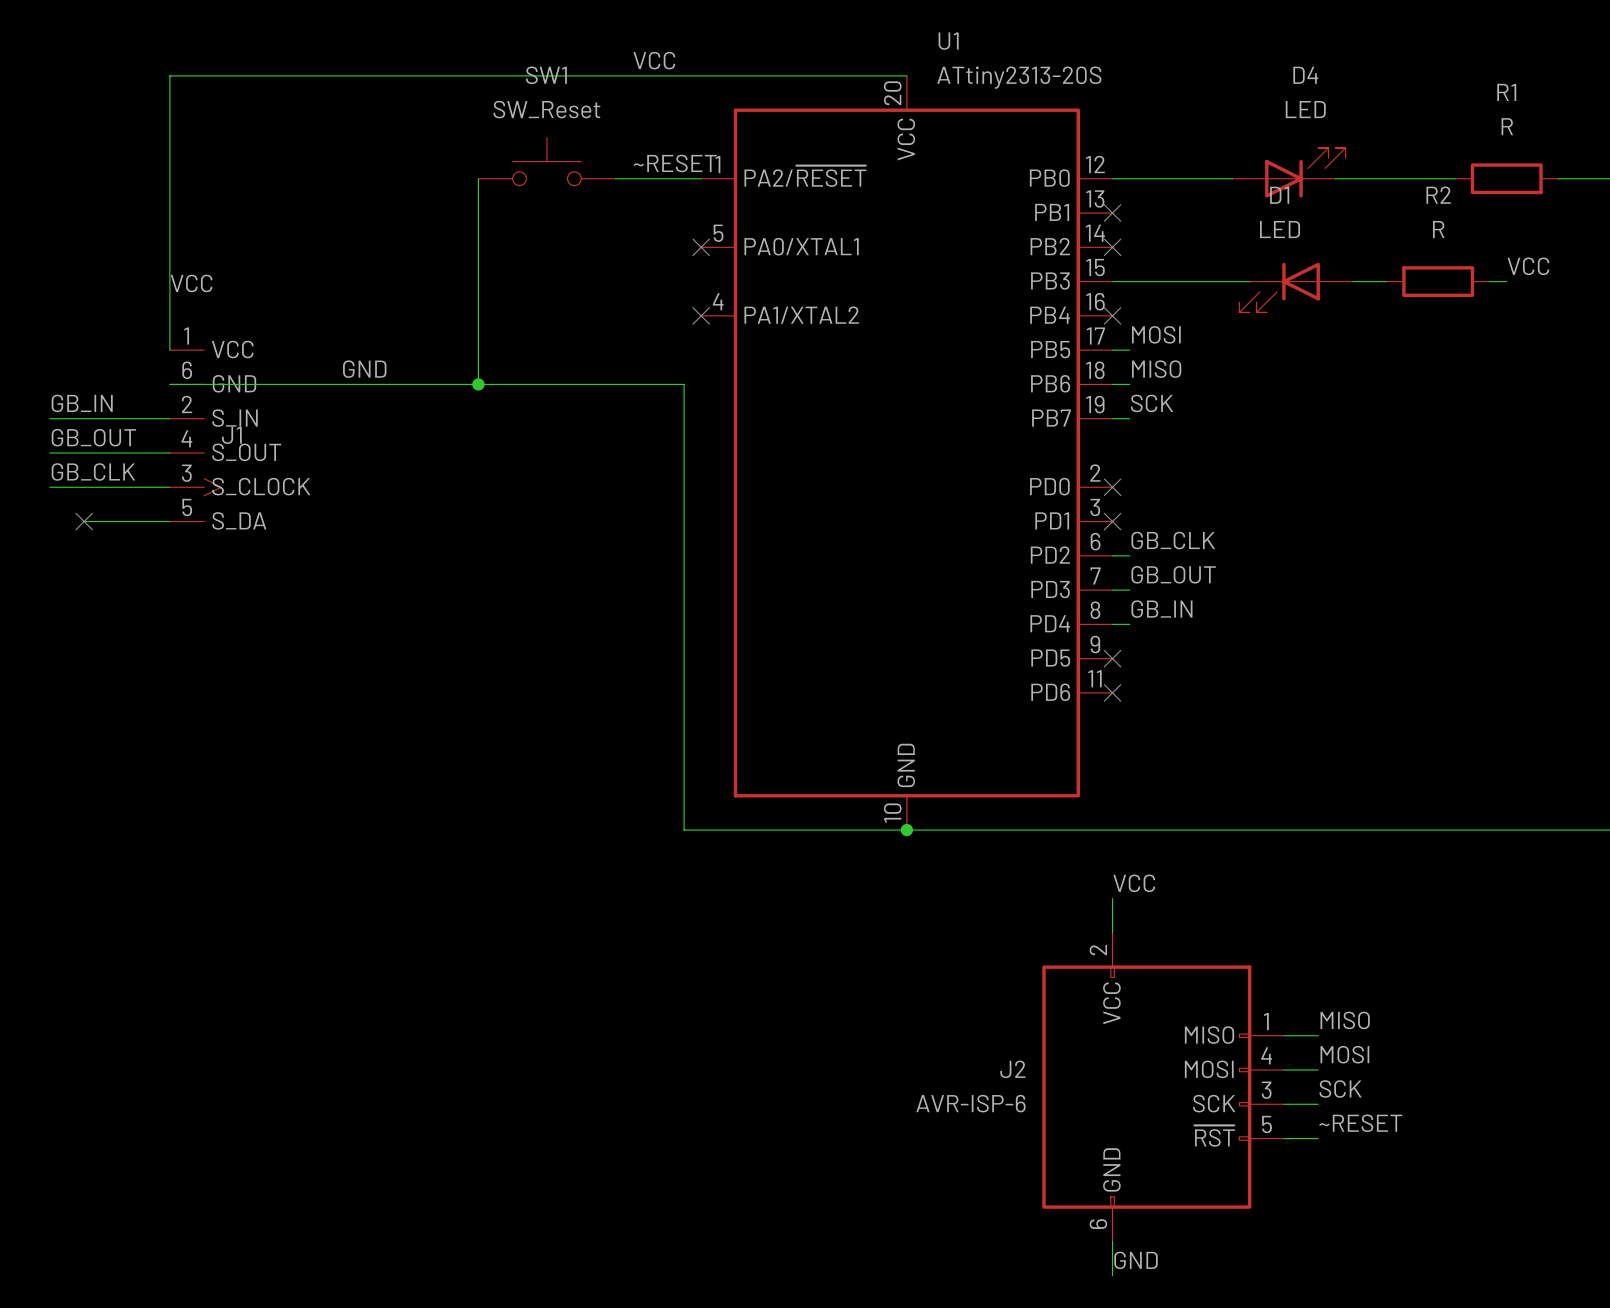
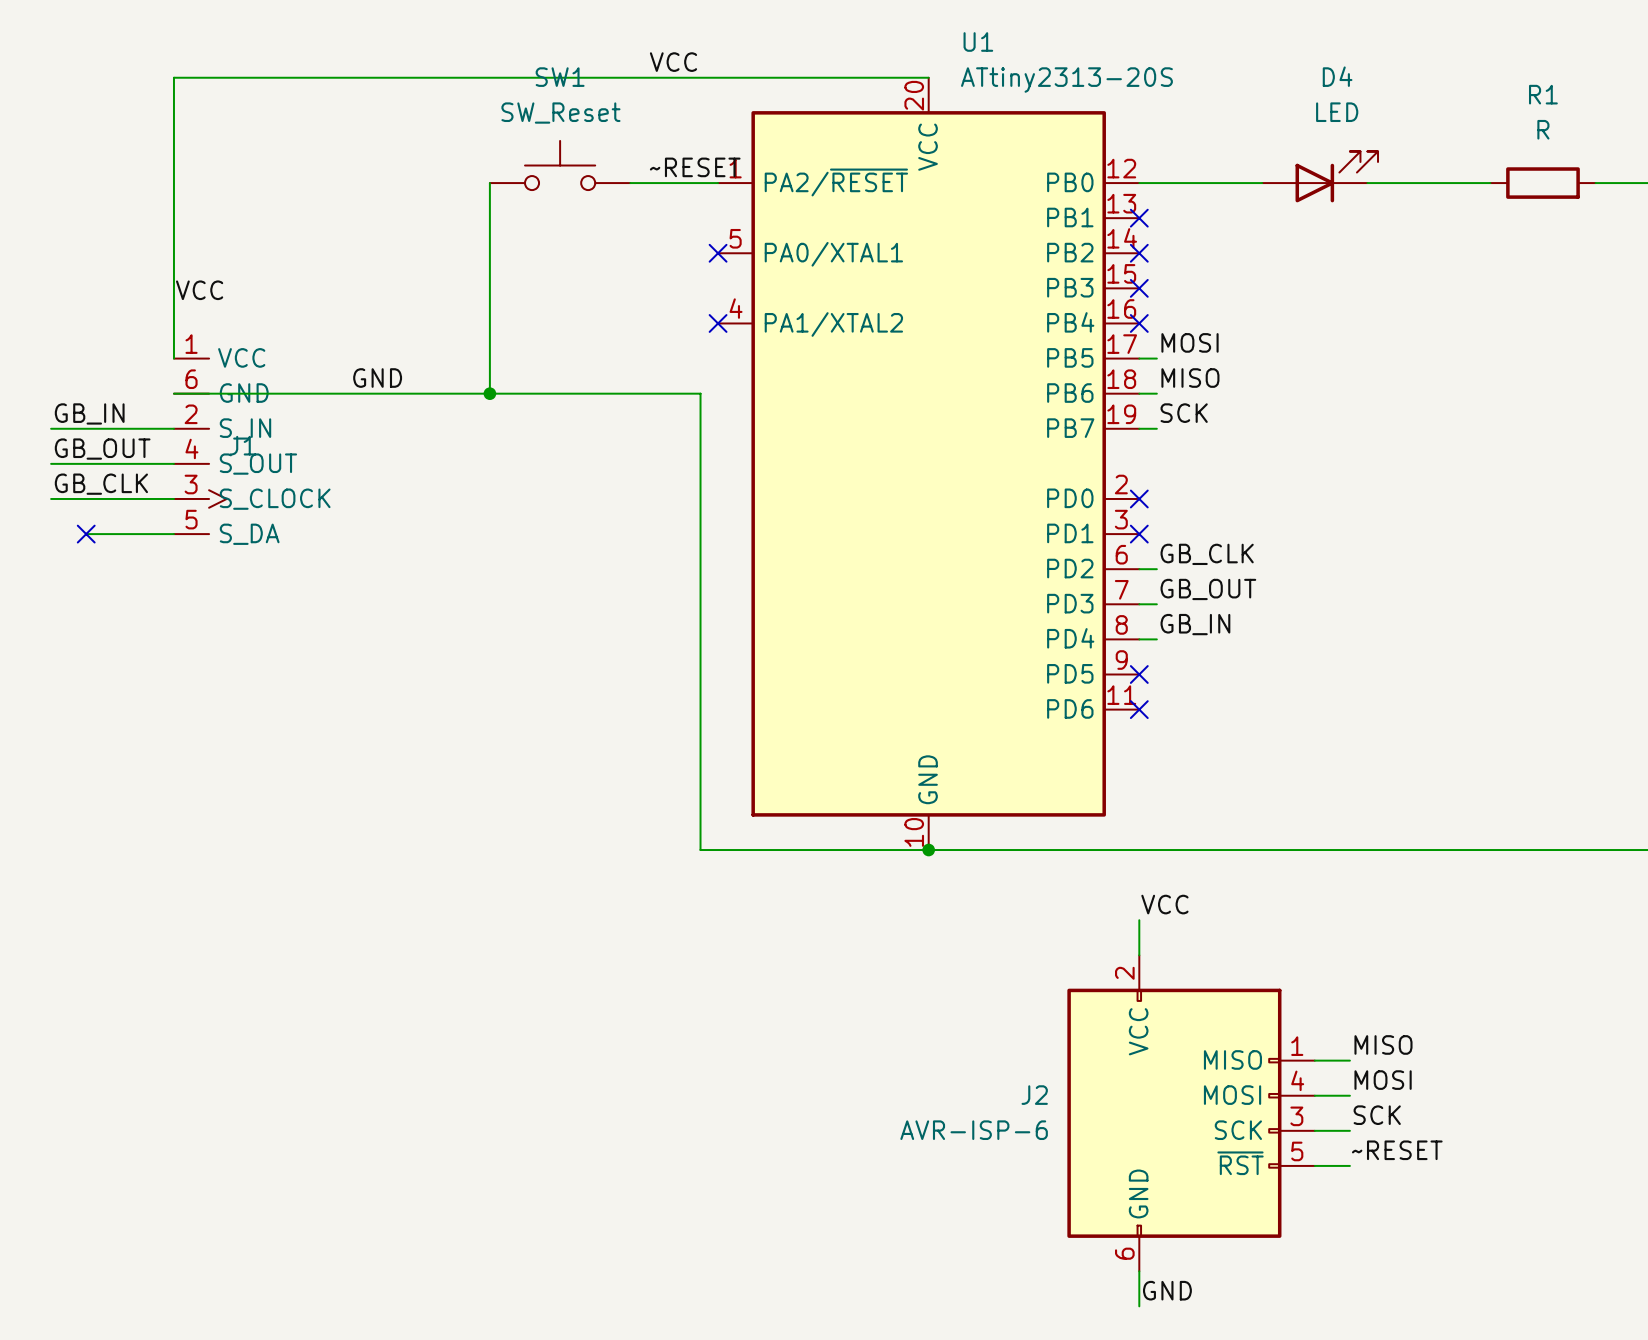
label: VCC (1528, 266) -> none
wire: (1112, 281) (1249, 281) -> none
no-connect mark: none -> (1139, 288)
wire: (1352, 281) (1386, 281) -> none
R2: R (1438, 281) -> none
wire: (1489, 281) (1506, 281) -> none
D1: LED (1295, 287) -> none

